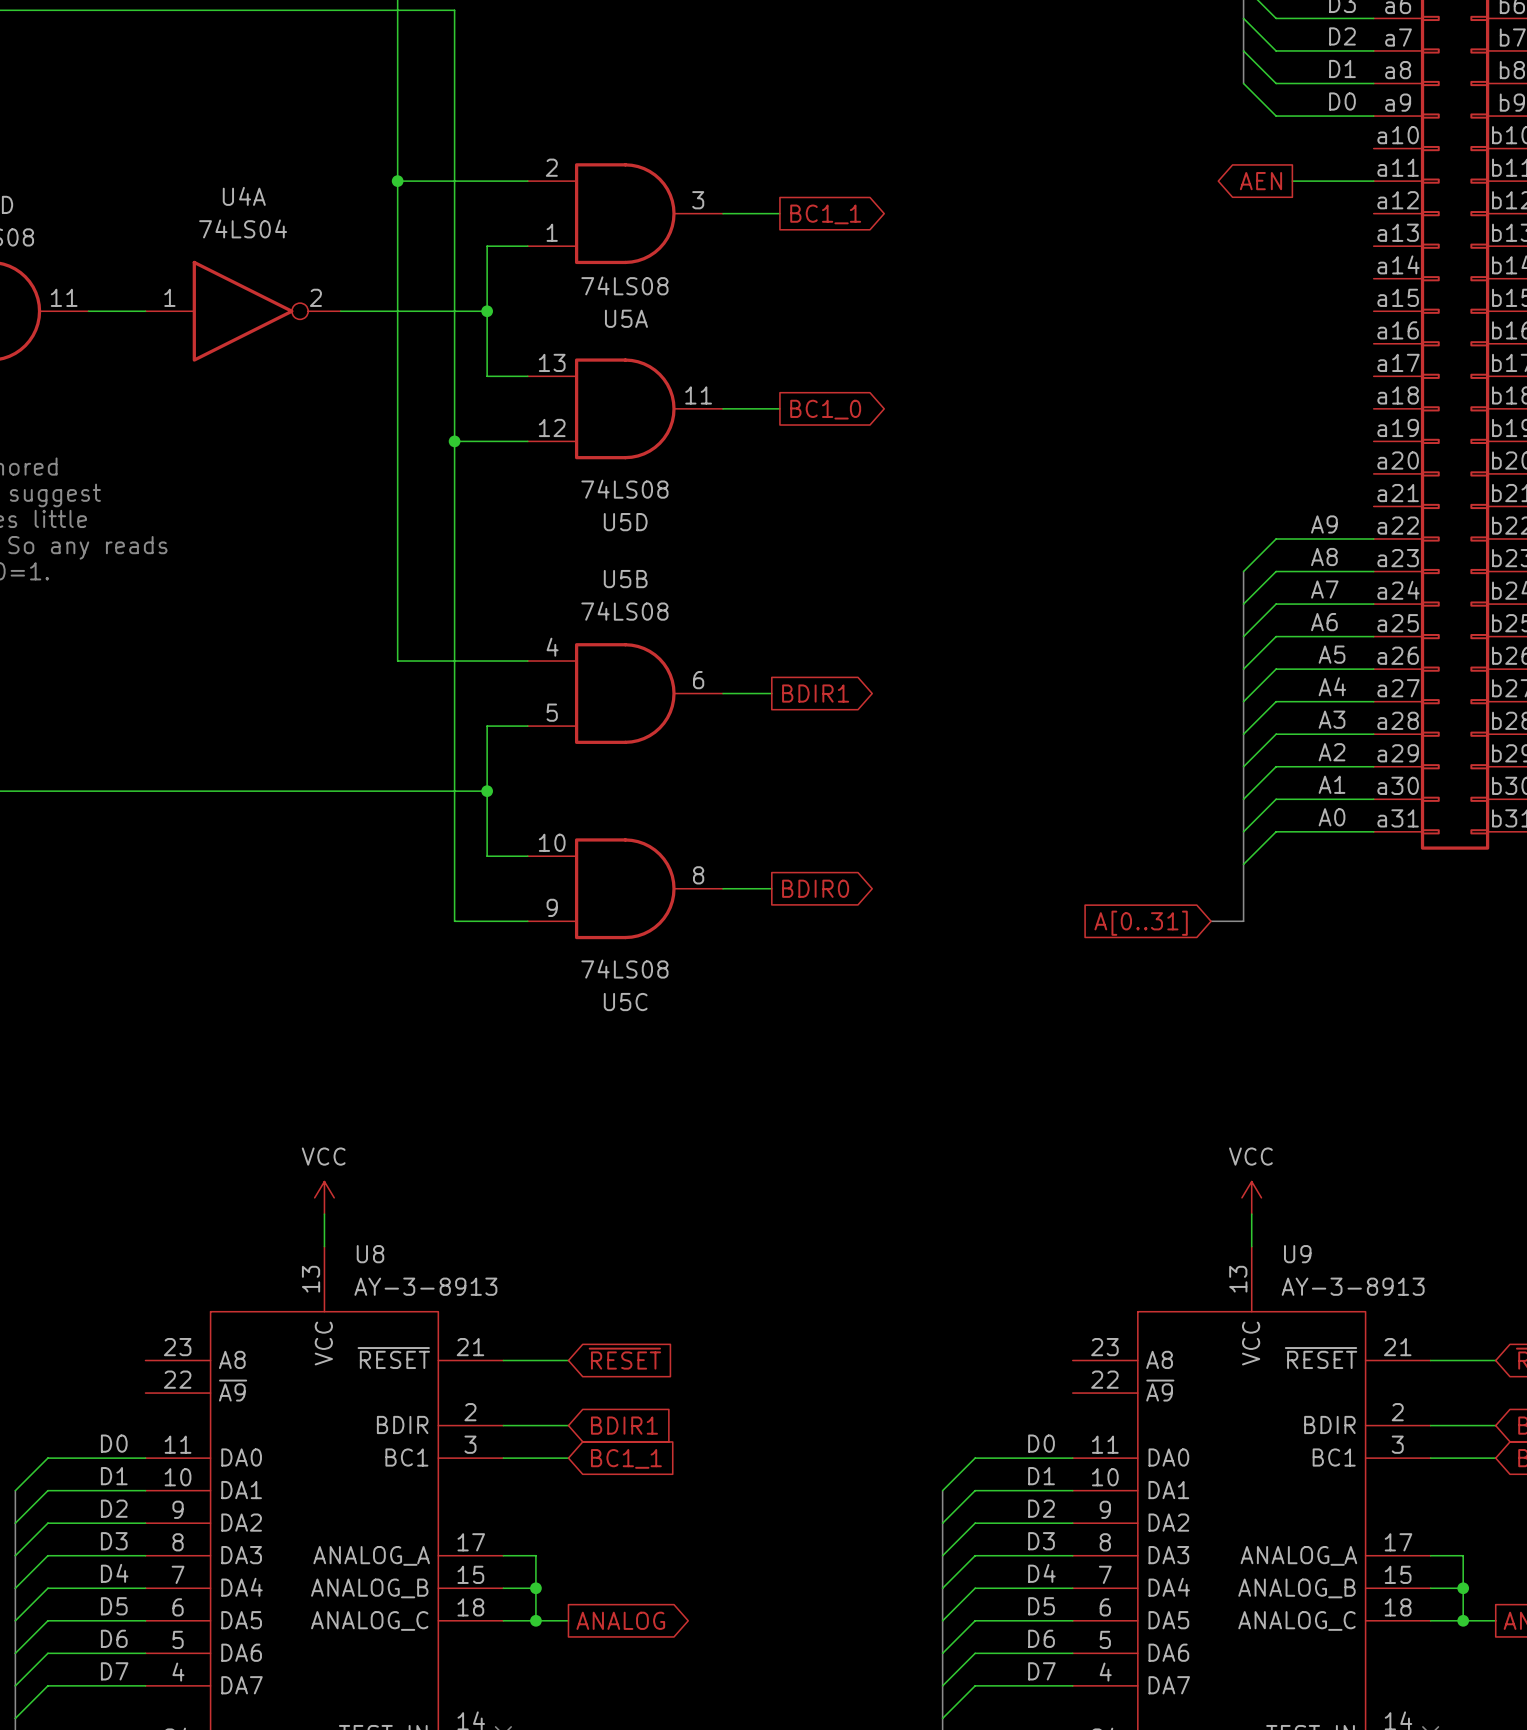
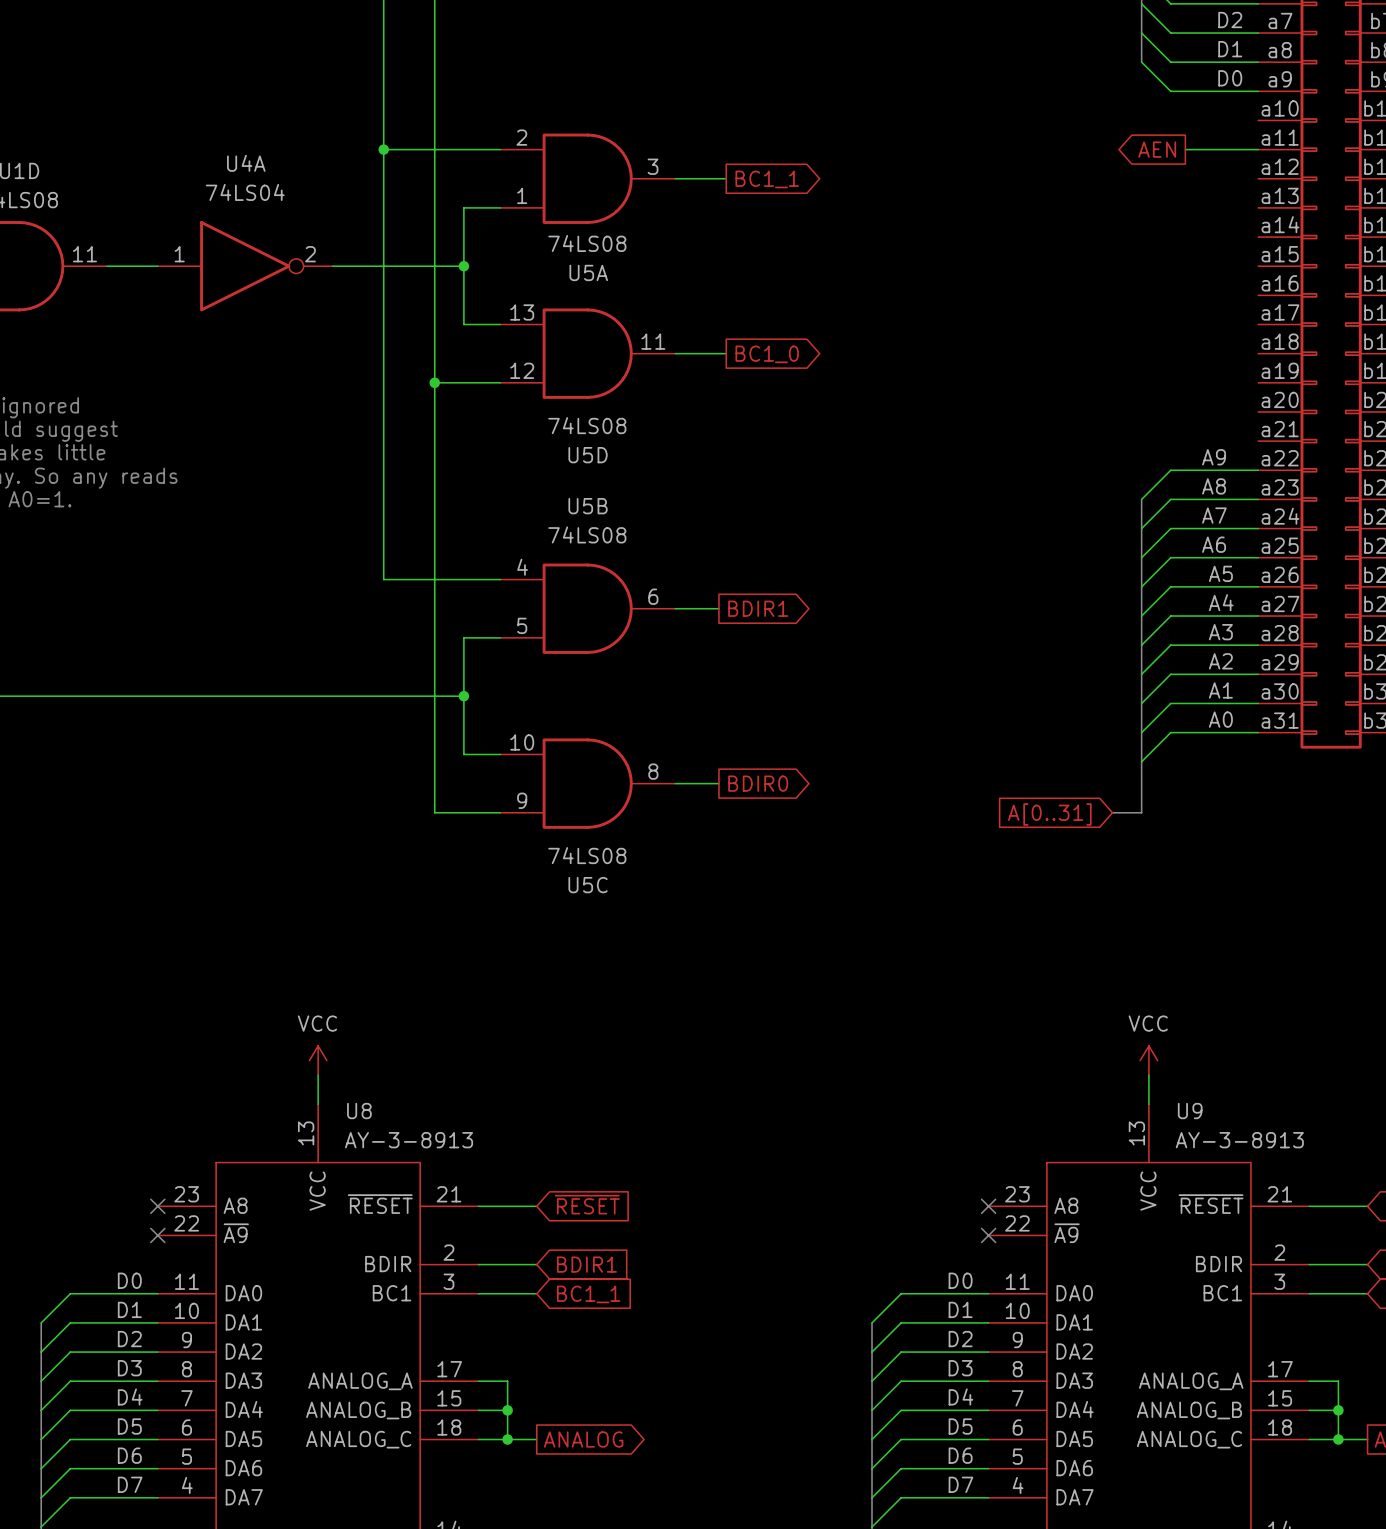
no-connect mark: none -> (157, 1206)
no-connect mark: none -> (988, 1206)
no-connect mark: none -> (157, 1235)
no-connect mark: none -> (988, 1235)

